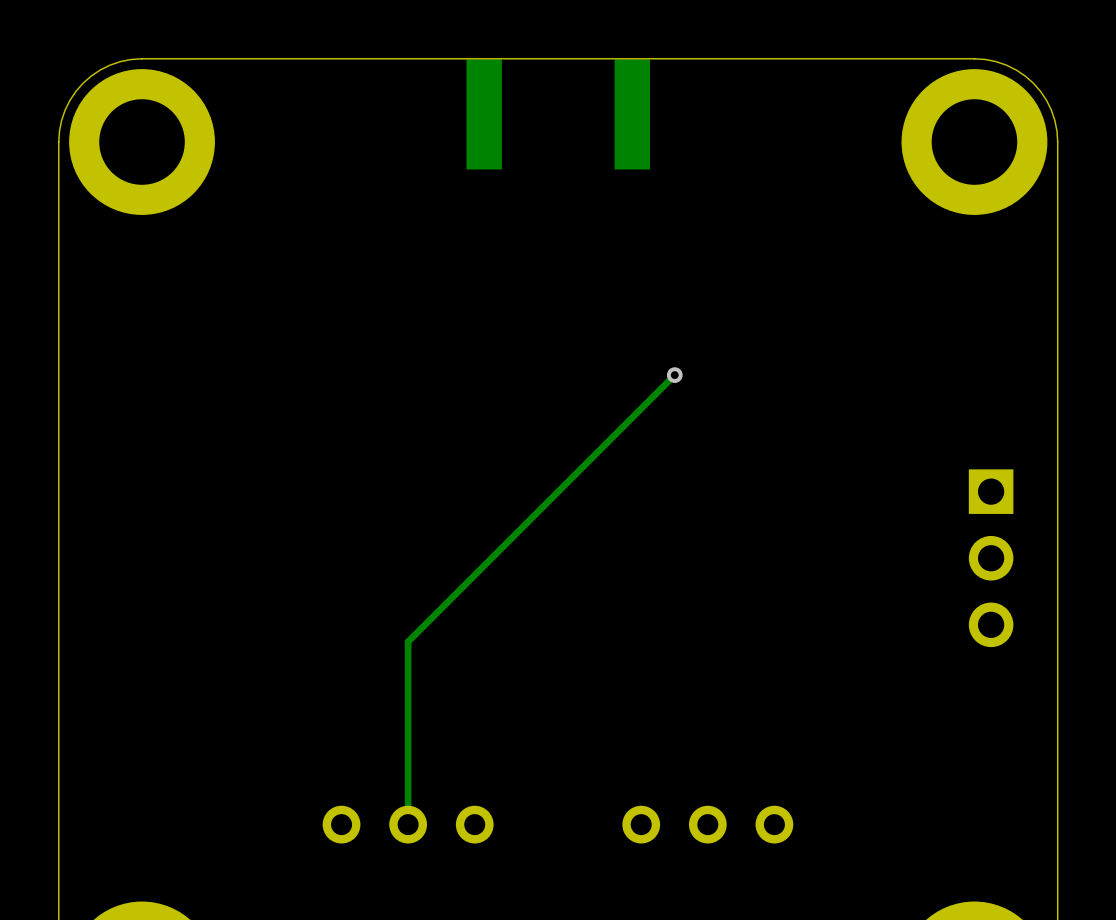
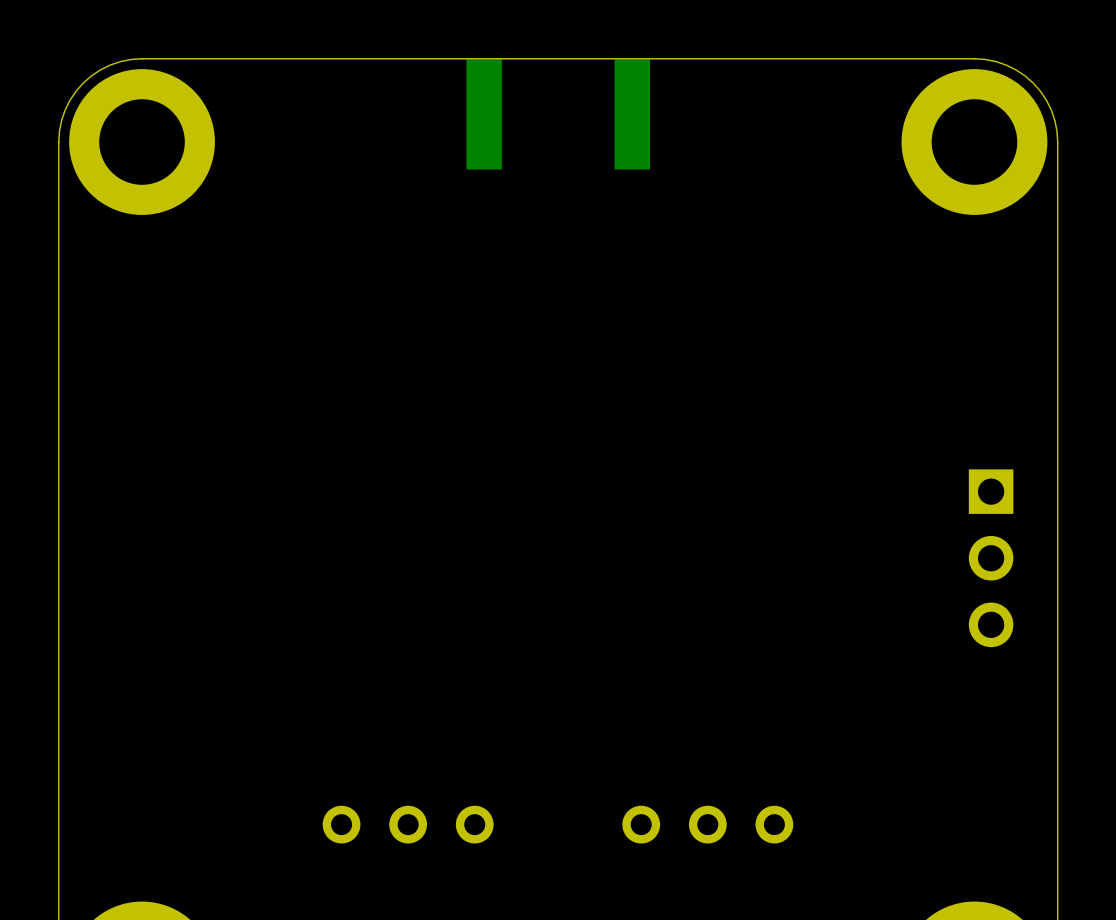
track: (674, 375) (408, 641) (408, 824) -> none
via: (674, 375) -> none

